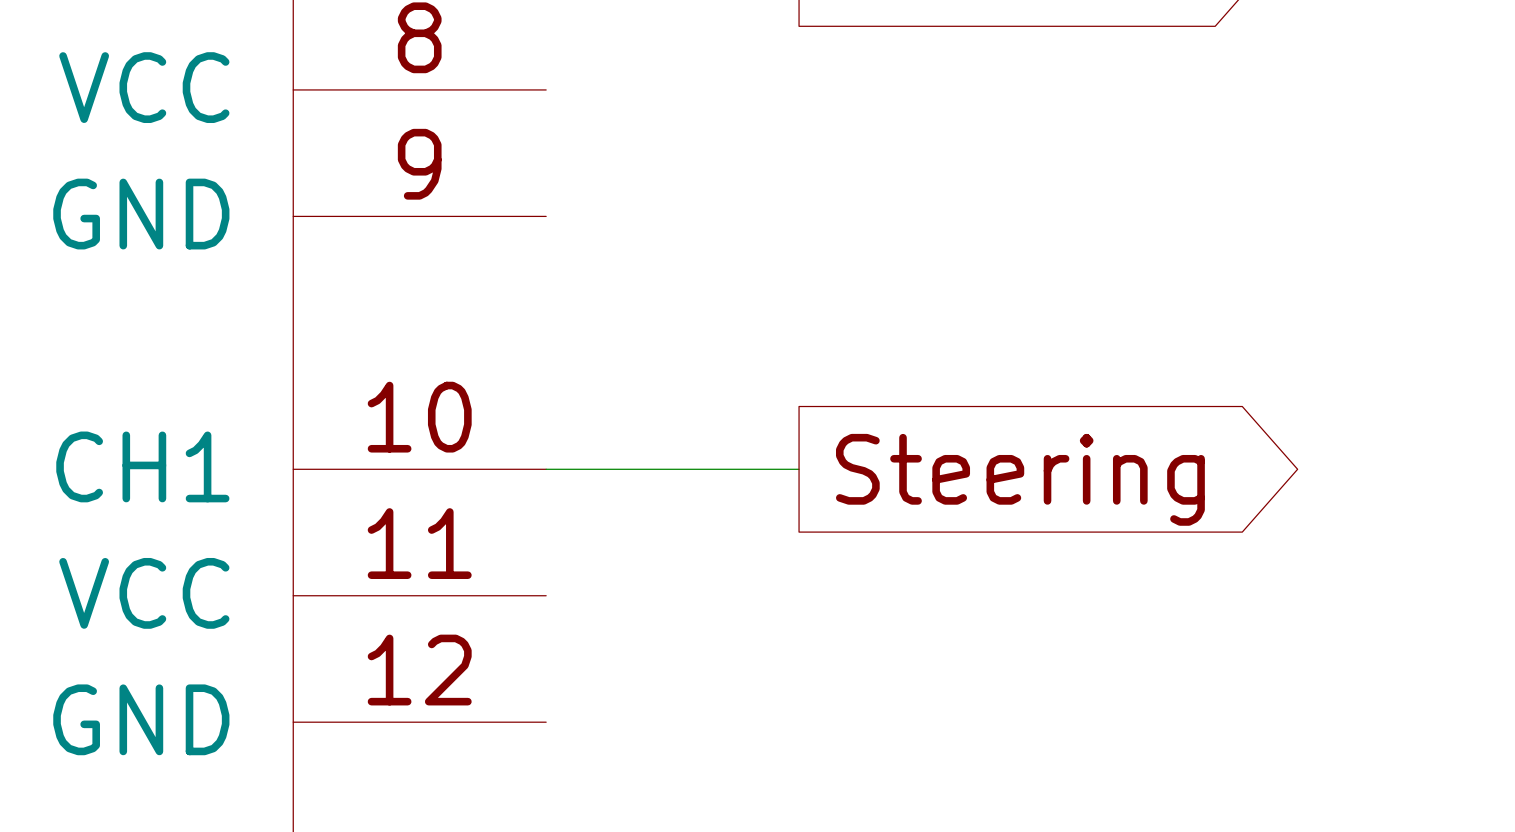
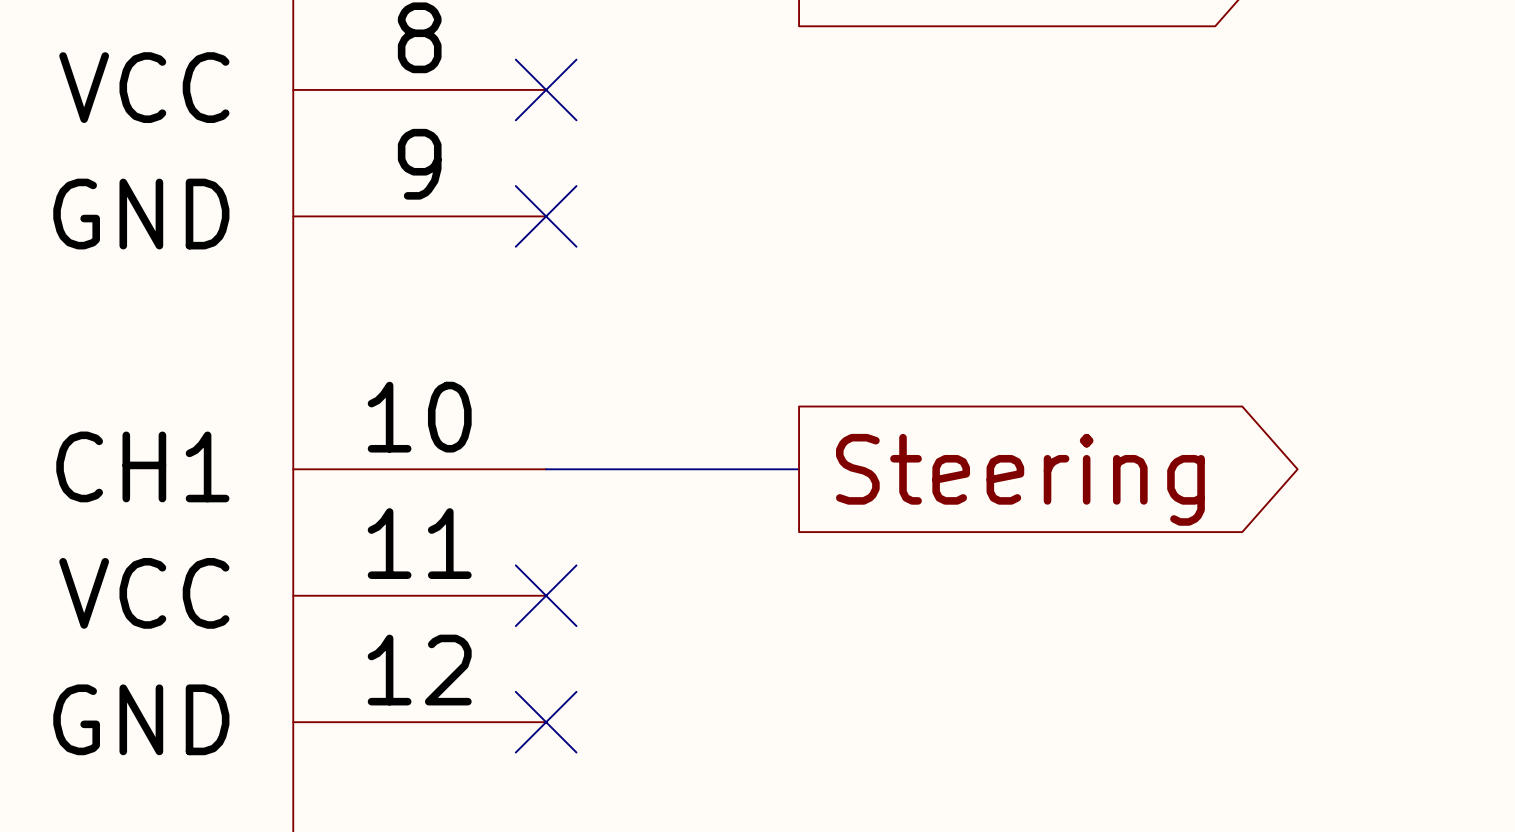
no-connect mark: none -> (546, 89)
no-connect mark: none -> (546, 216)
no-connect mark: none -> (546, 595)
no-connect mark: none -> (546, 722)

